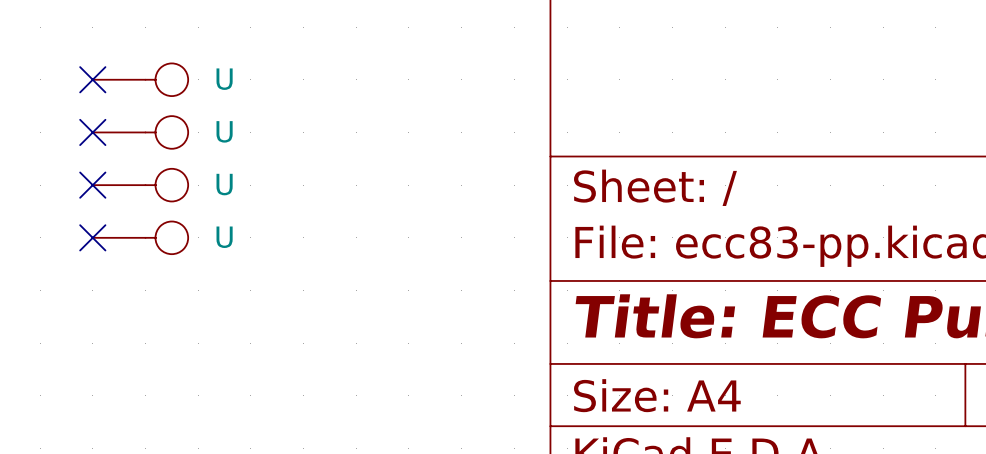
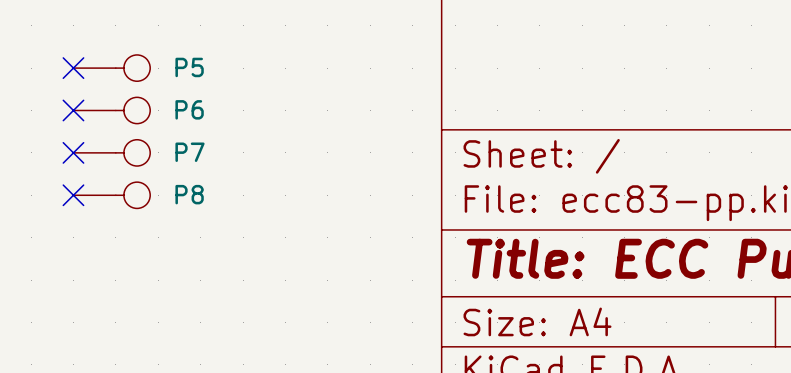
U name: U (224, 79) -> P5 (189, 67)
U name: U (224, 131) -> P6 (189, 109)
U name: U (224, 184) -> P7 (190, 152)
U name: U (224, 237) -> P8 (189, 194)

